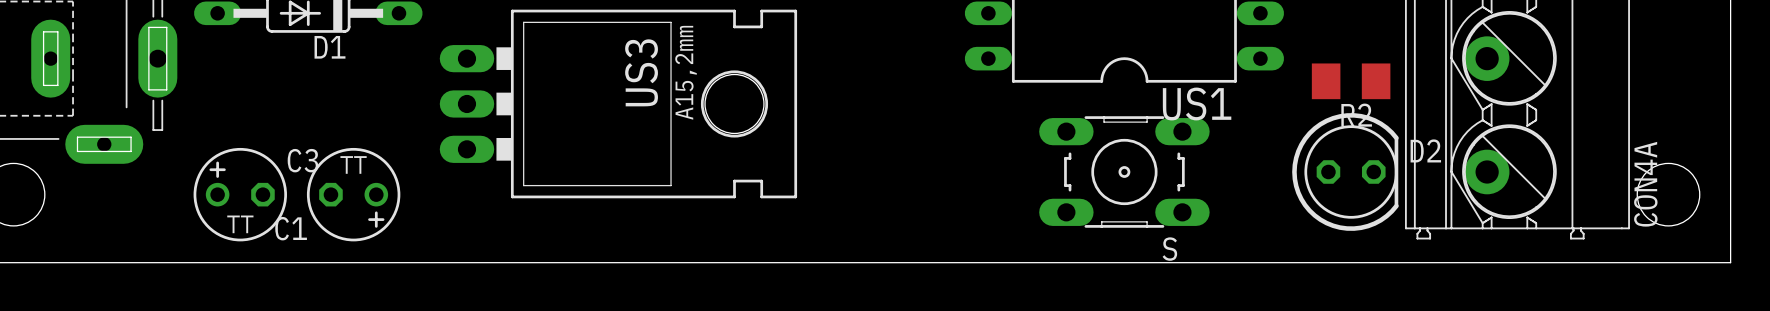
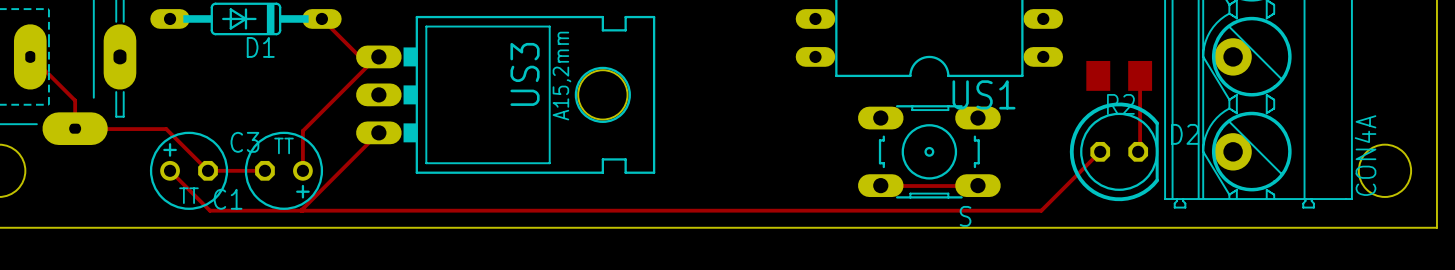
track: none -> (321, 18) (367, 64) (378, 56) (302, 130) (302, 170)
track: none -> (30, 56) (75, 100) (75, 129) (166, 129) (208, 170) (264, 170)
track: none -> (1140, 75) (1140, 149) (1138, 151)
track: none -> (378, 132) (301, 210) (209, 210) (170, 170)
track: none -> (1100, 151) (1041, 210) (301, 209)
track: none -> (880, 185) (977, 185)

